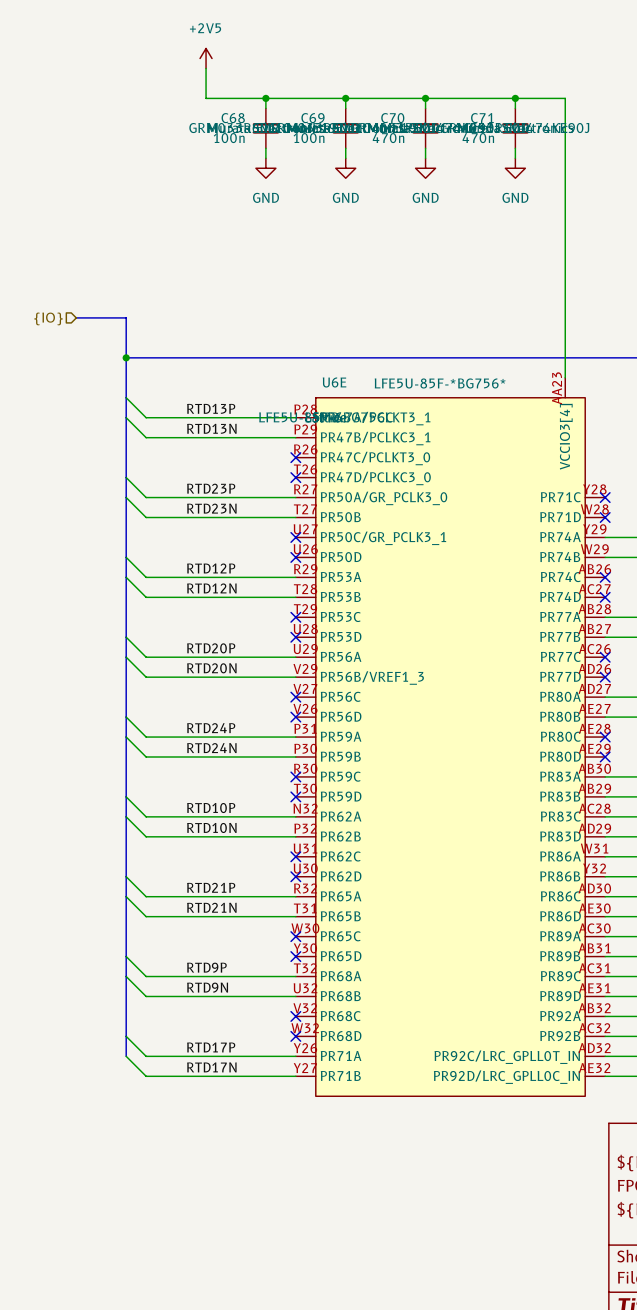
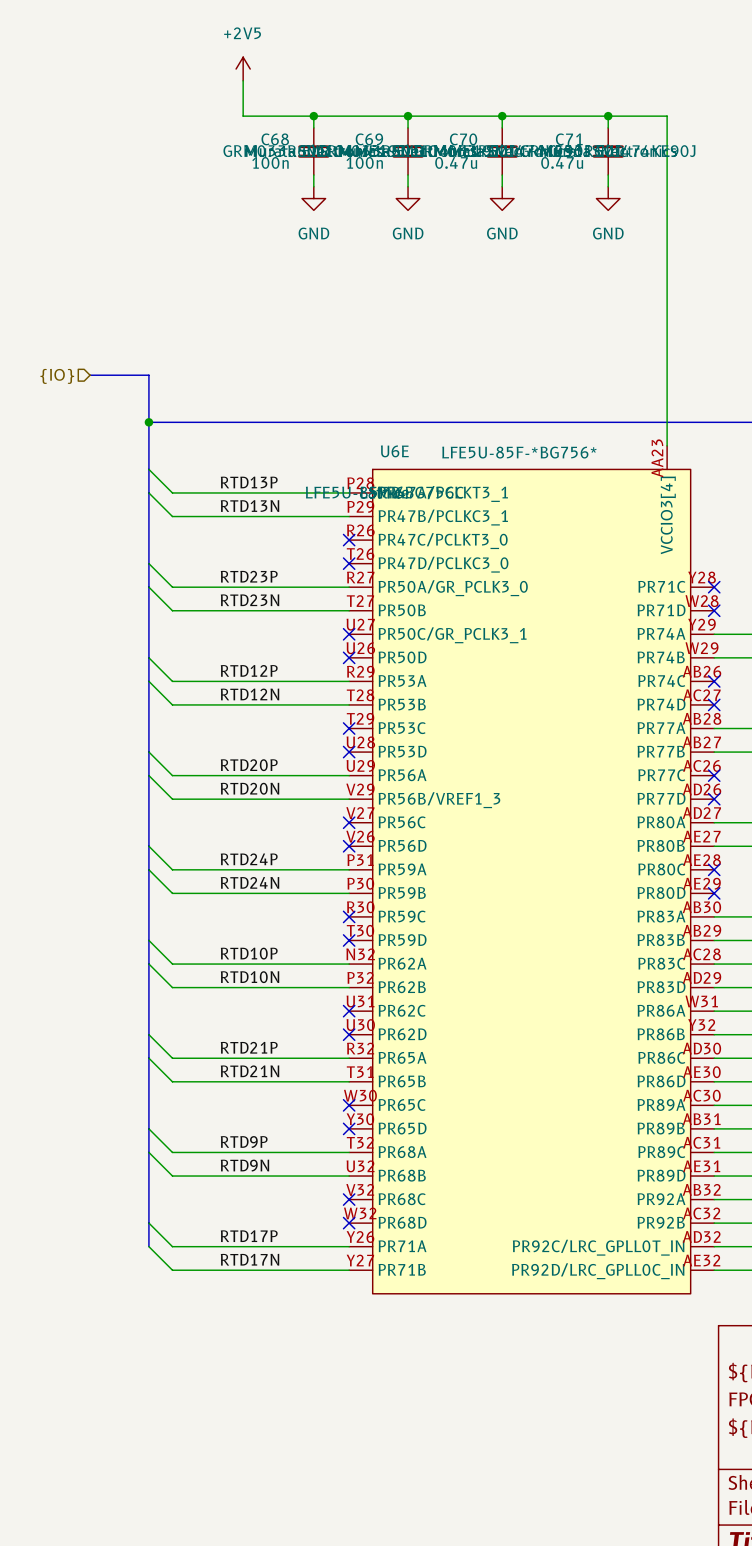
C70 value: 470n (388, 138) -> 0.47u (456, 162)
C71 value: 470n (478, 138) -> 0.47u (562, 162)

